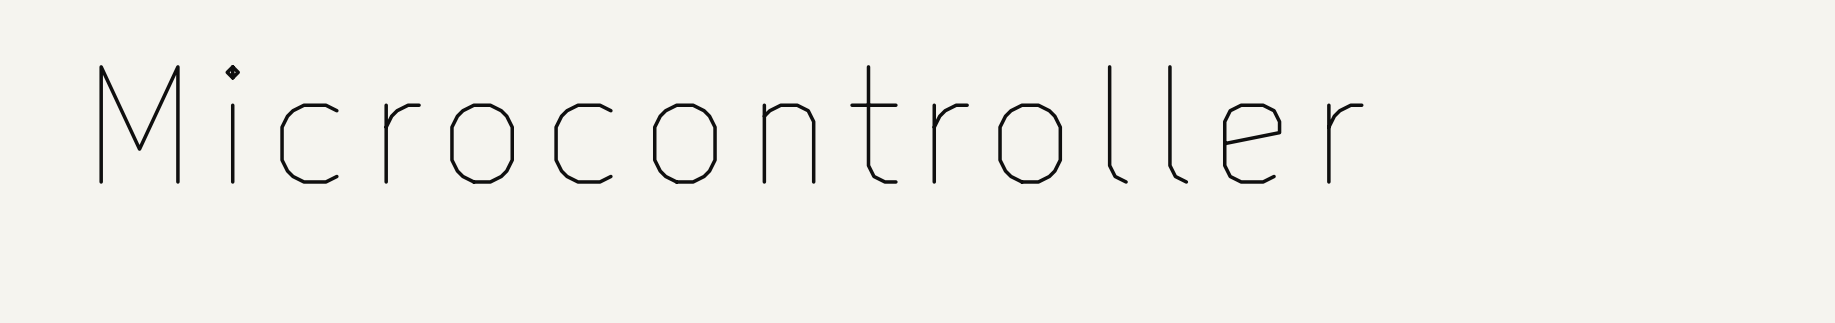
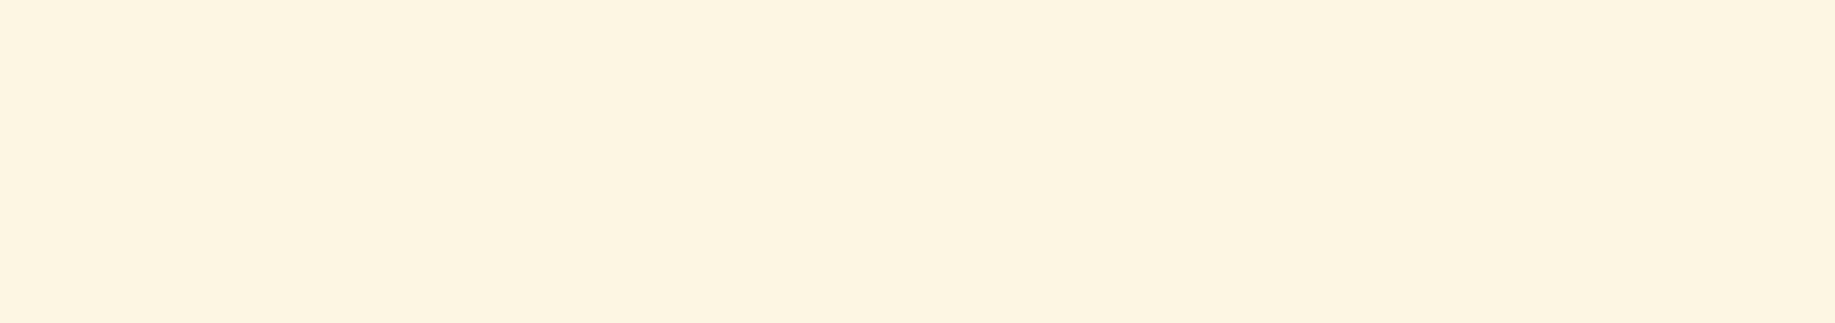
label: Microcontroller (731, 124) -> none

